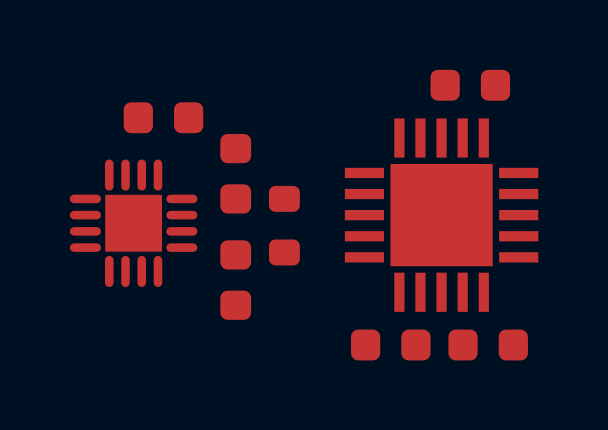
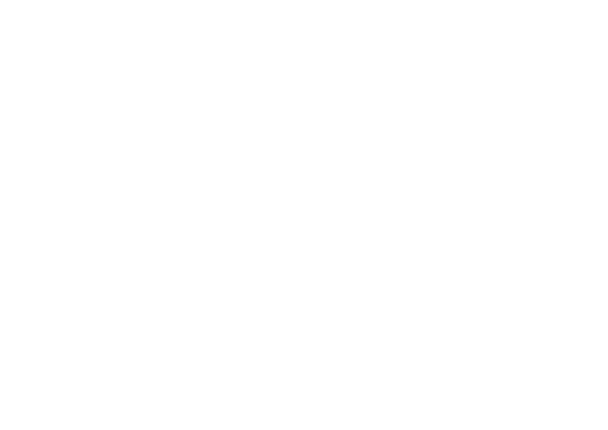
part: (470, 85) -> none
part: (163, 117) -> none
part: (235, 173) -> none
part: (441, 215) -> none
part: (133, 223) -> none
part: (284, 225) -> none
part: (235, 280) -> none
part: (390, 345) -> none
part: (488, 345) -> none

